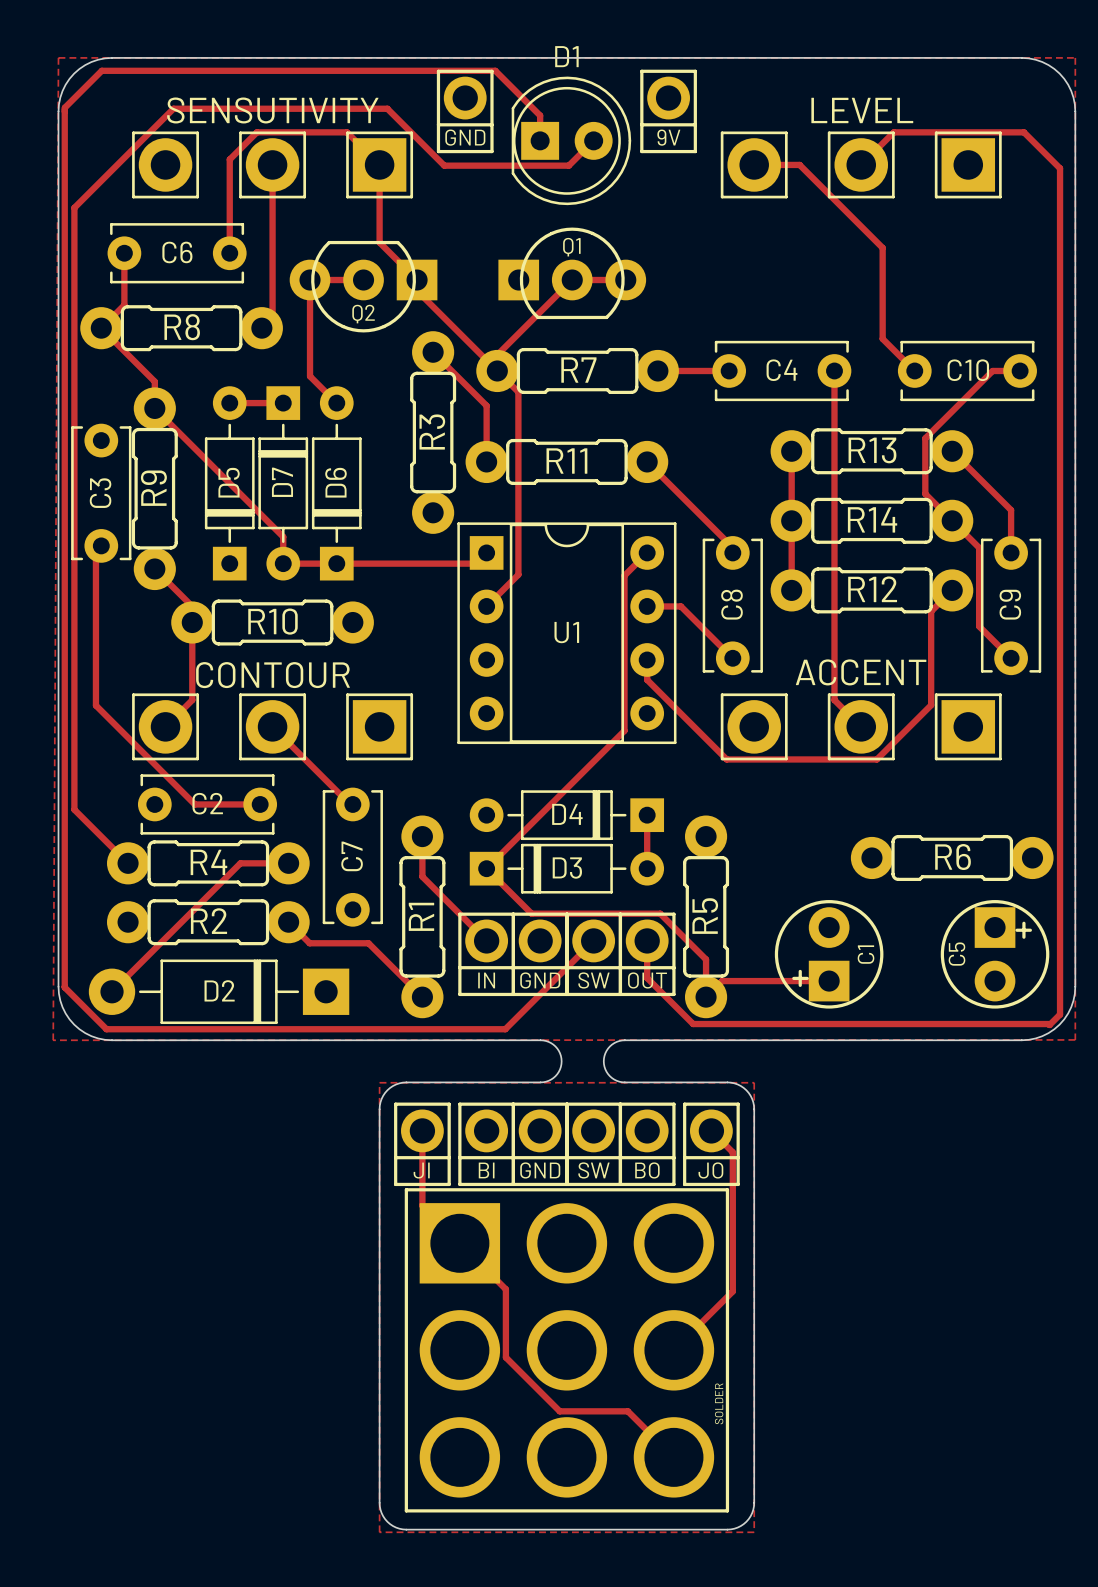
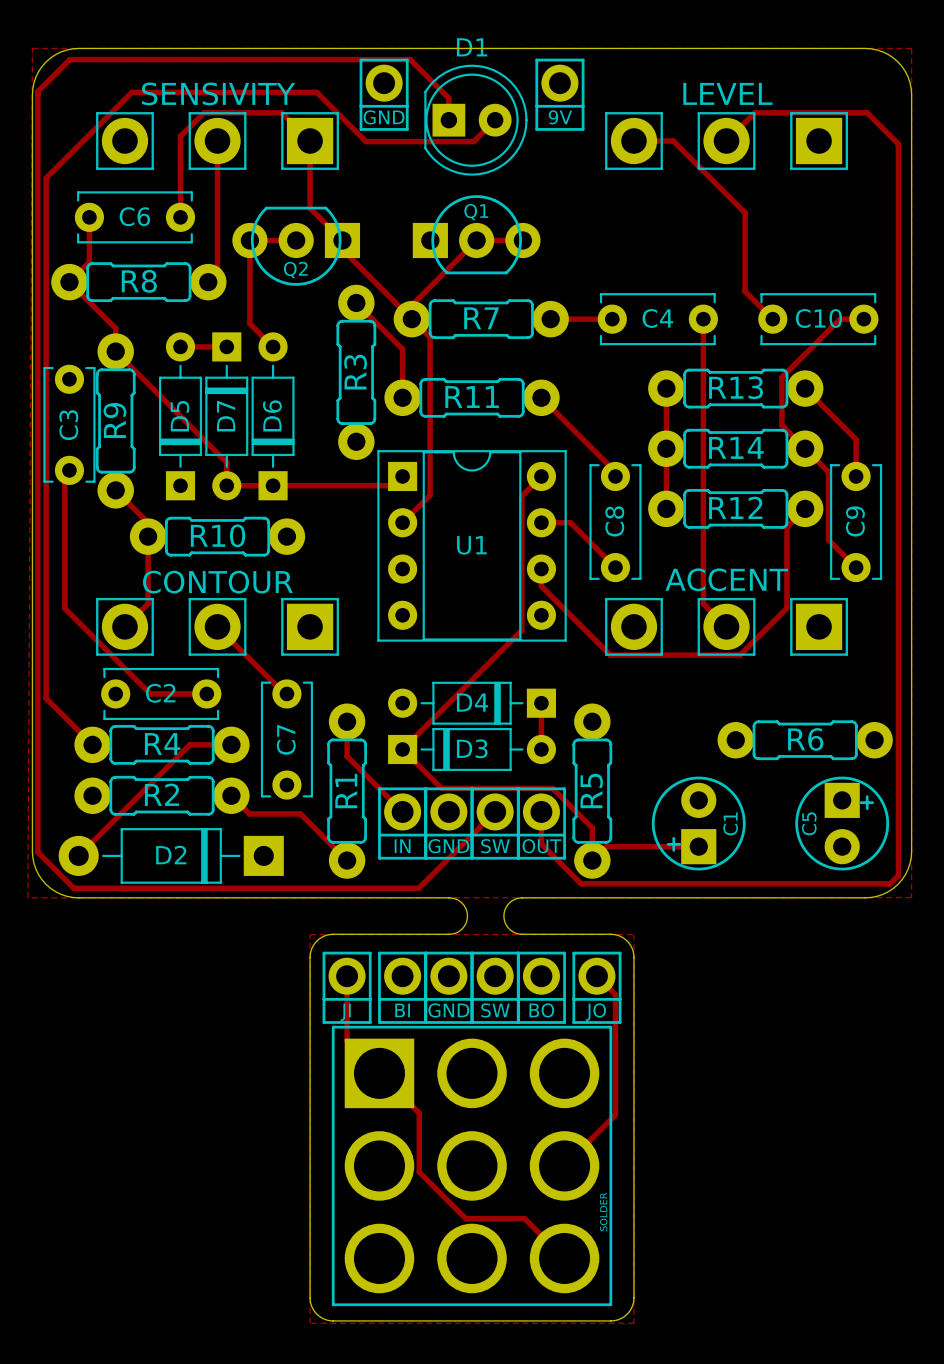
SENSUTIVITY name: SENSUTIVITY (272, 110) -> SENSIVITY (218, 93)

